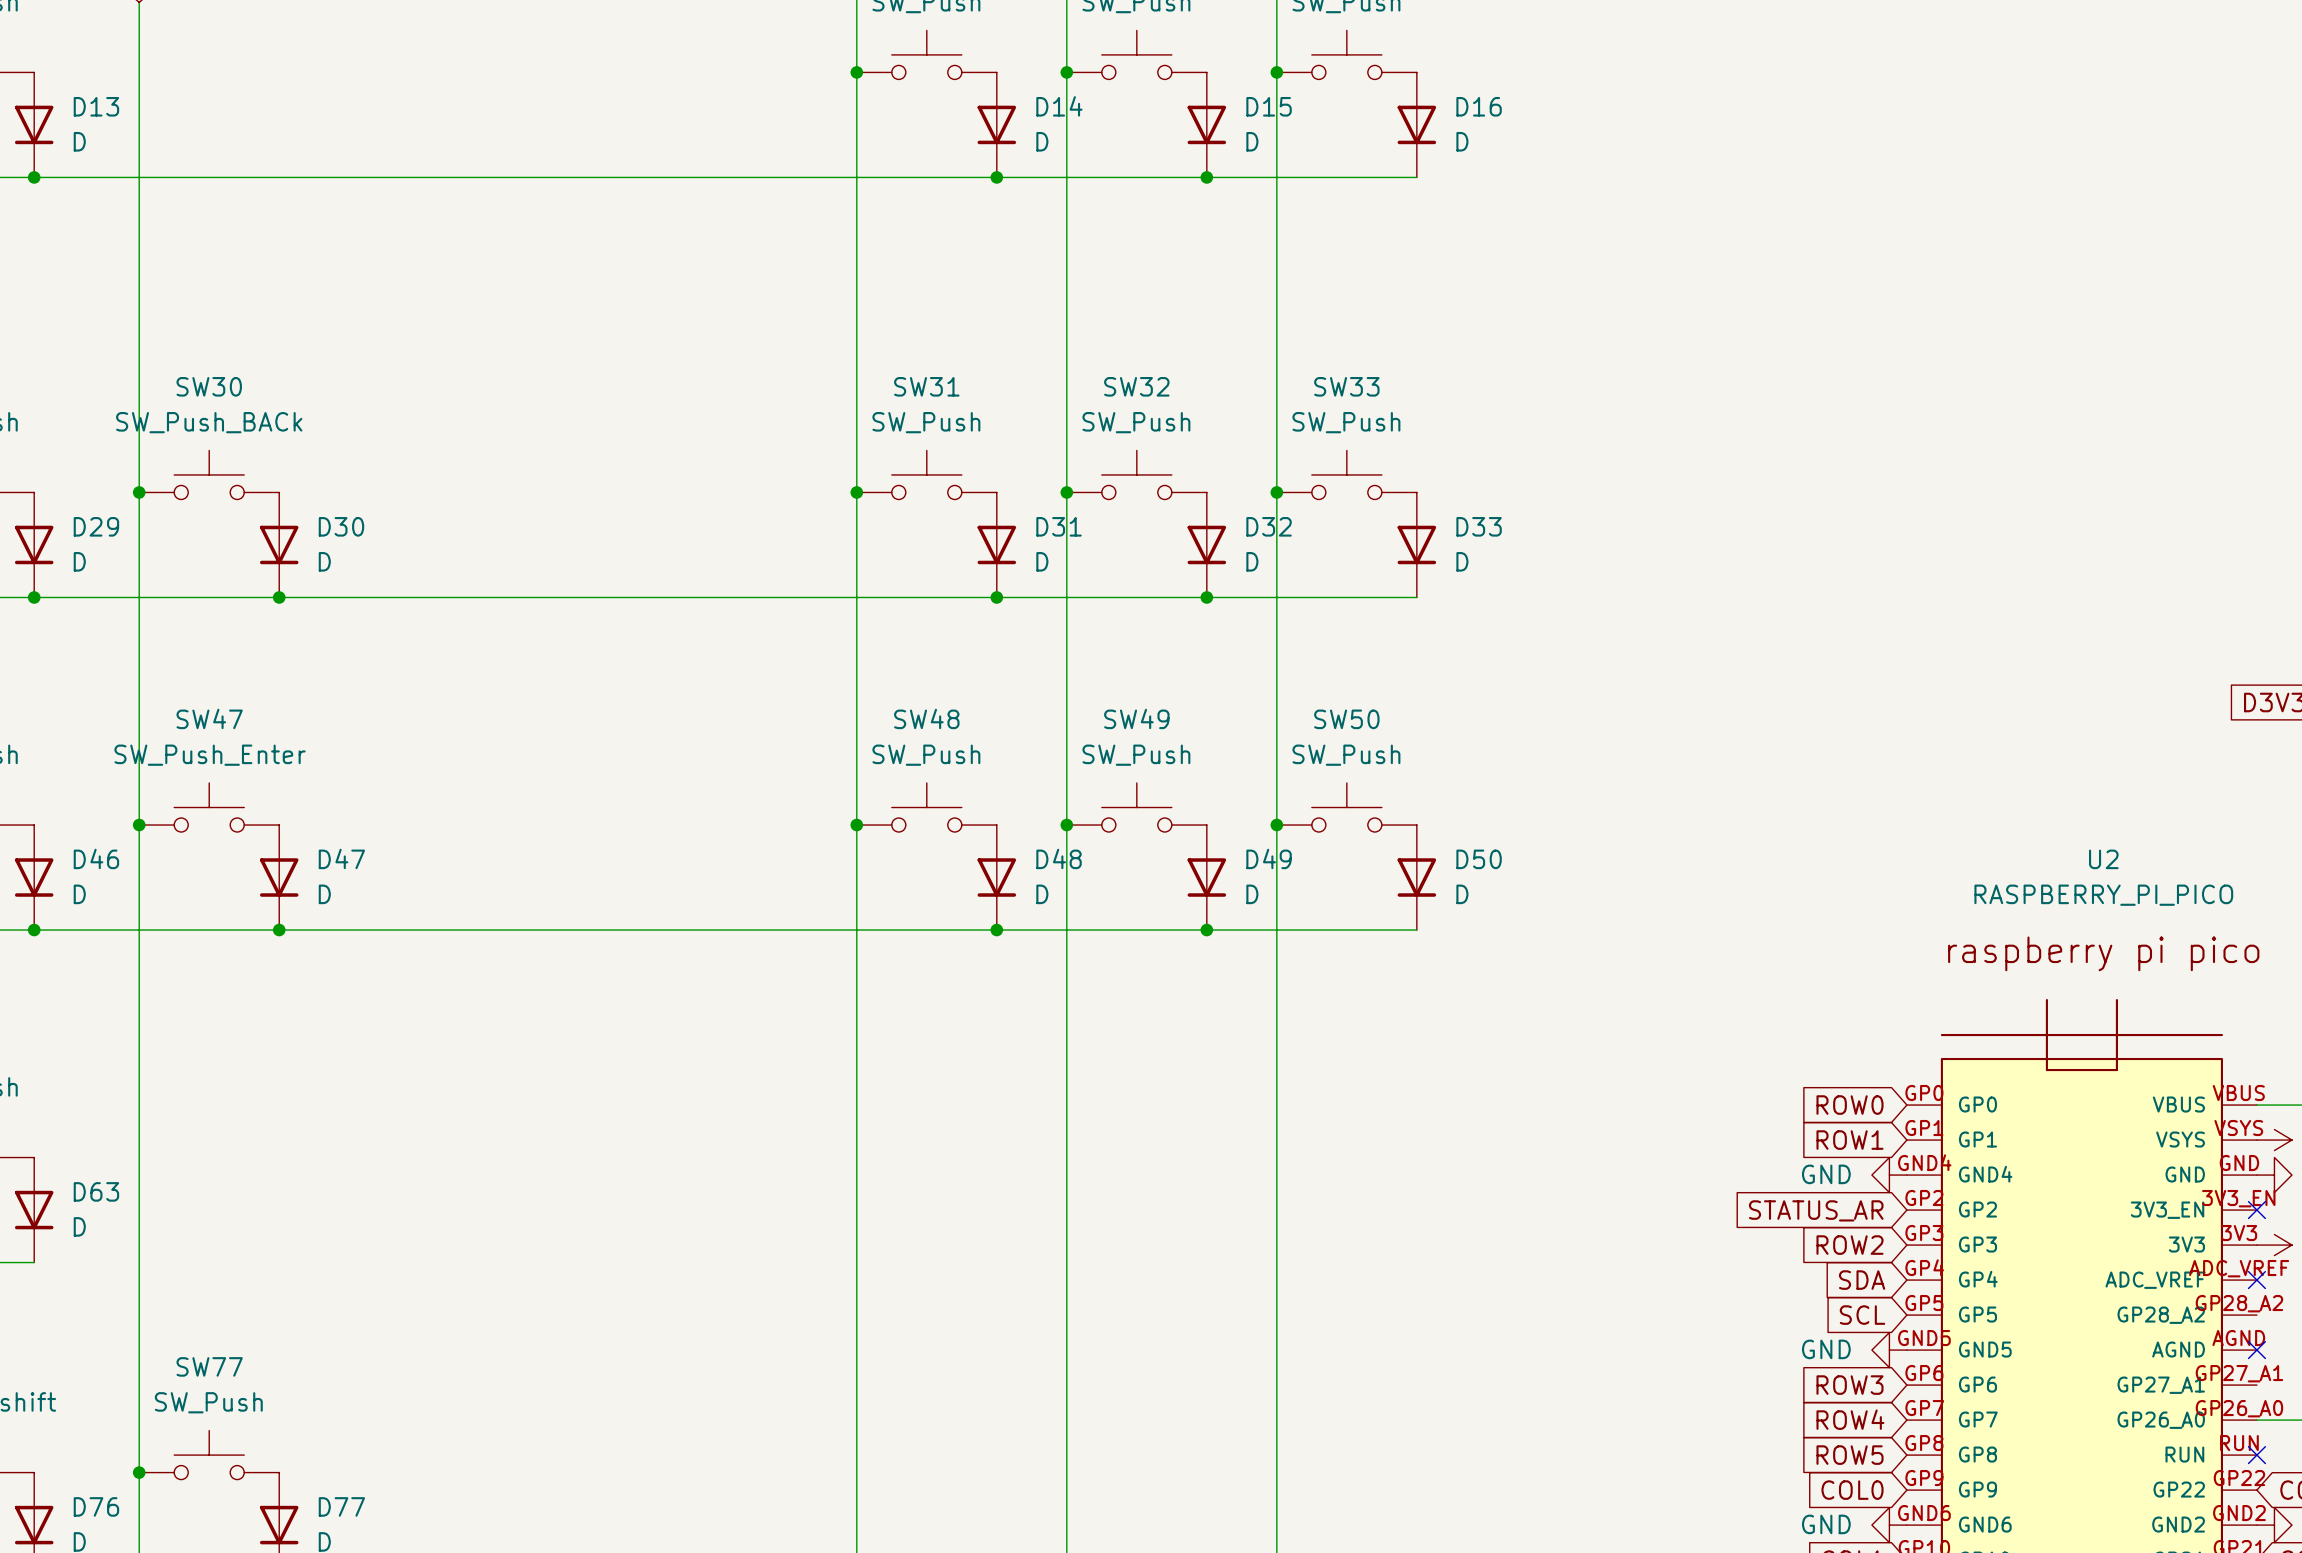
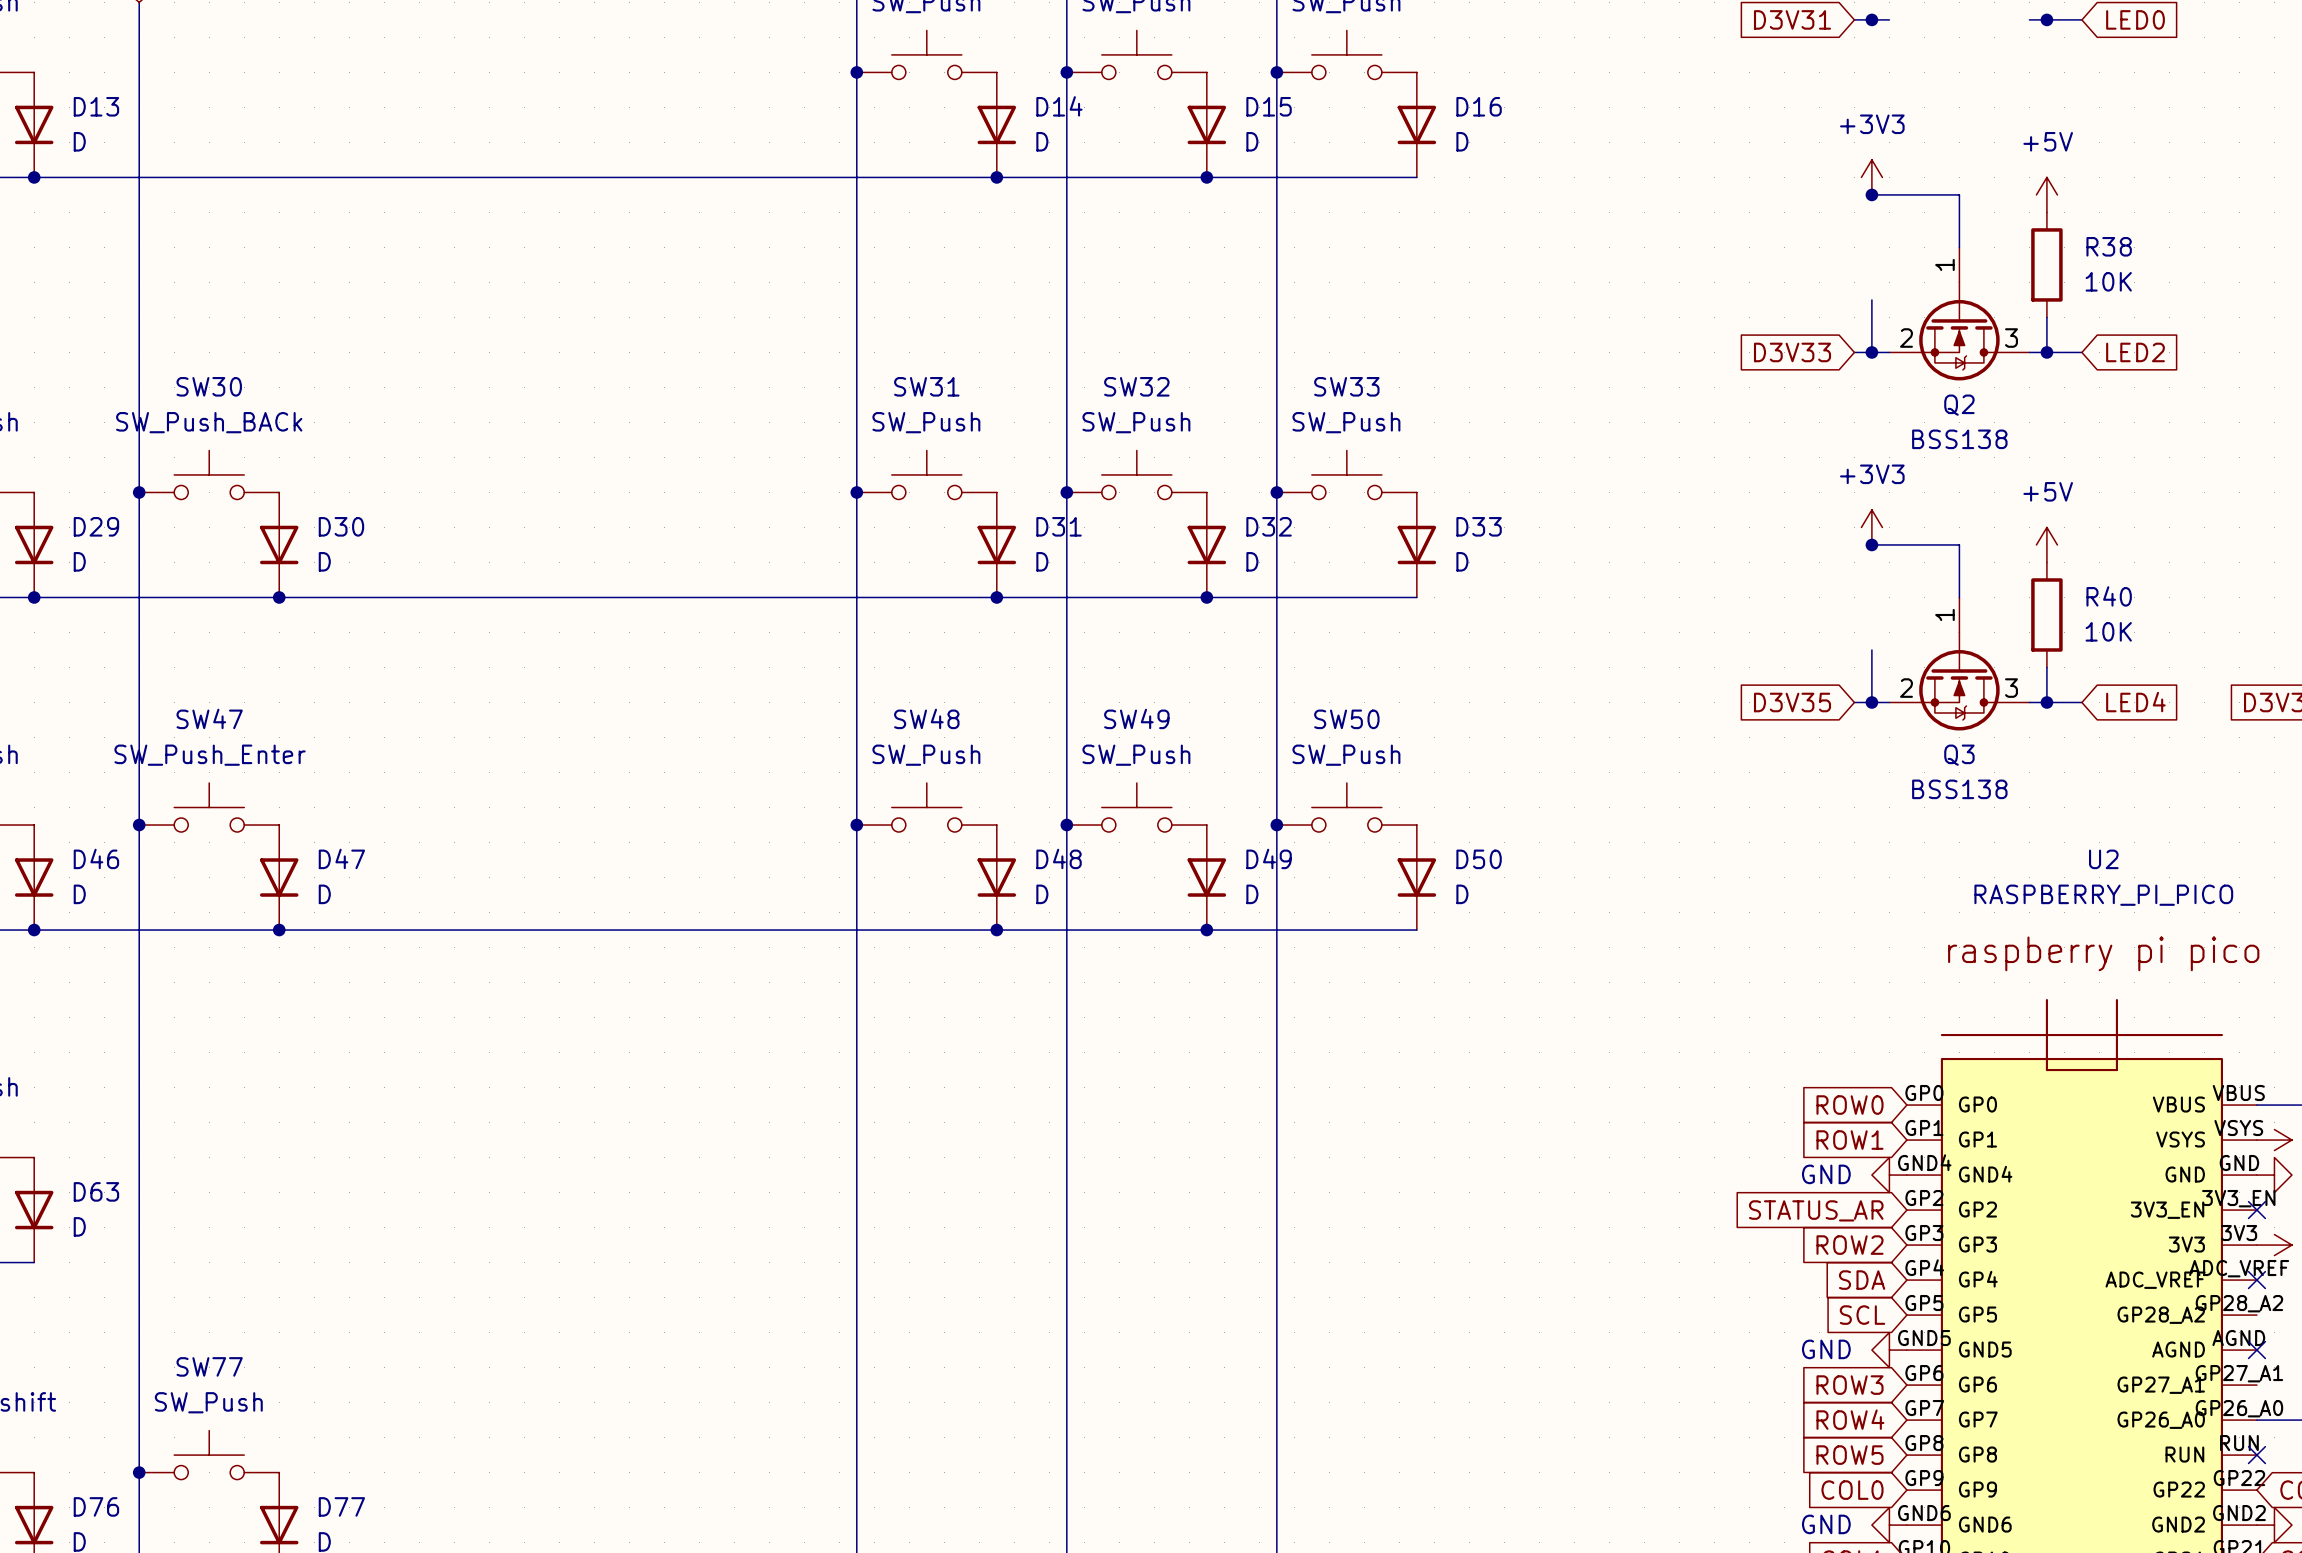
global label: none -> D3V31 (1792, 19)
wire: none -> (1854, 19) (1889, 19)
junction: none -> (1871, 19)
wire: none -> (2029, 19) (2081, 19)
junction: none -> (2046, 19)
global label: none -> LED0 (2135, 19)
power symbol: none -> +3V3 (1871, 177)
wire: none -> (1871, 194) (1959, 194) (1959, 247)
junction: none -> (1871, 194)
power symbol: none -> +5V (2046, 194)
R38: none -> 10K (2046, 264)
wire: none -> (1871, 299) (1871, 352)
Q2: none -> BSS138 (1959, 313)
wire: none -> (2046, 317) (2046, 352)
global label: none -> D3V33 (1792, 352)
wire: none -> (1854, 352) (1889, 352)
junction: none -> (1871, 352)
wire: none -> (2029, 352) (2081, 352)
junction: none -> (2046, 352)
global label: none -> LED2 (2135, 352)
power symbol: none -> +3V3 (1871, 527)
wire: none -> (1871, 544) (1959, 544) (1959, 597)
junction: none -> (1871, 544)
power symbol: none -> +5V (2046, 544)
R40: none -> 10K (2046, 614)
wire: none -> (1871, 649) (1871, 702)
Q3: none -> BSS138 (1959, 663)
wire: none -> (2046, 667) (2046, 702)
global label: none -> D3V35 (1792, 702)
wire: none -> (1854, 702) (1889, 702)
junction: none -> (1871, 702)
wire: none -> (2029, 702) (2081, 702)
junction: none -> (2046, 702)
global label: none -> LED4 (2135, 702)

